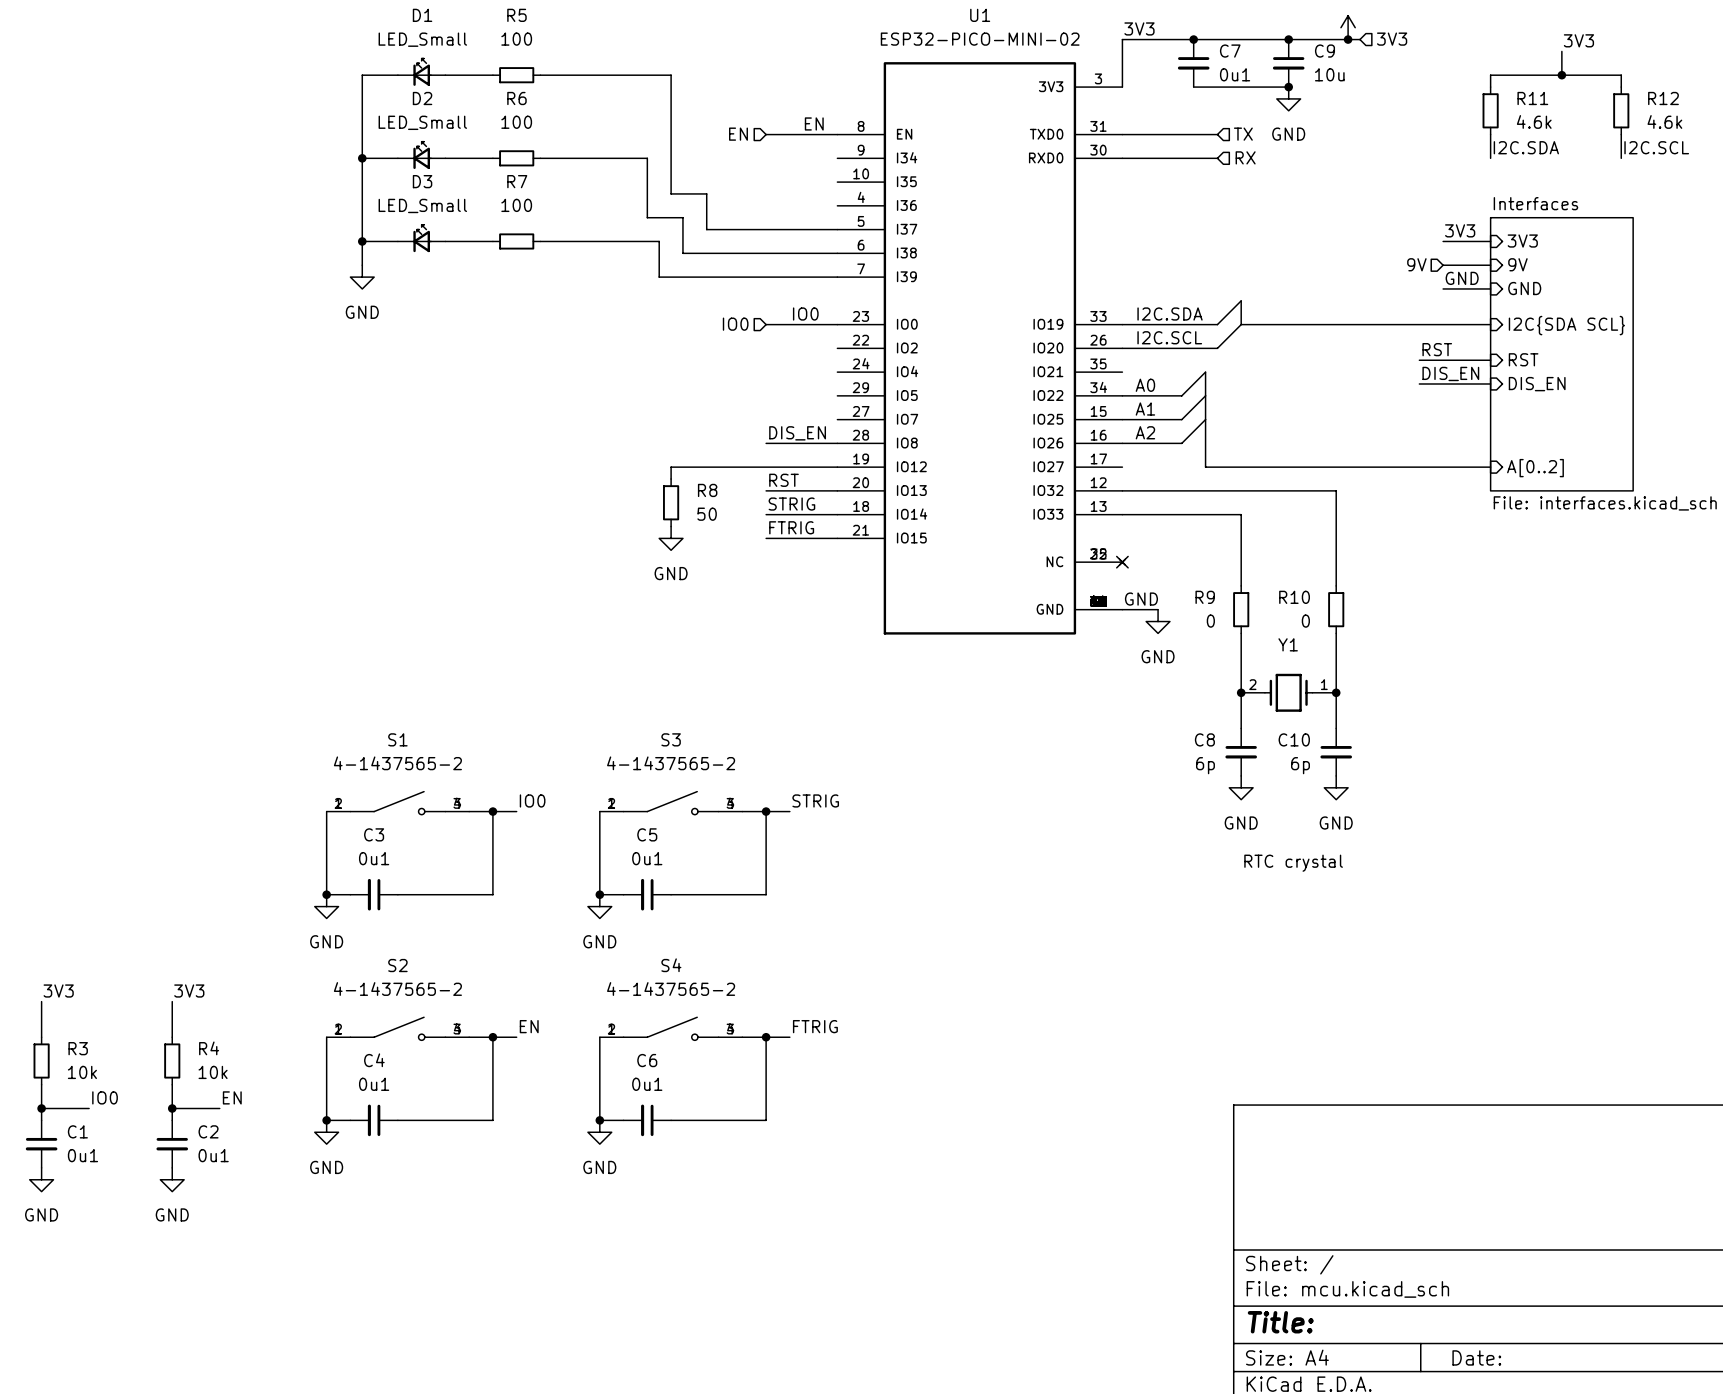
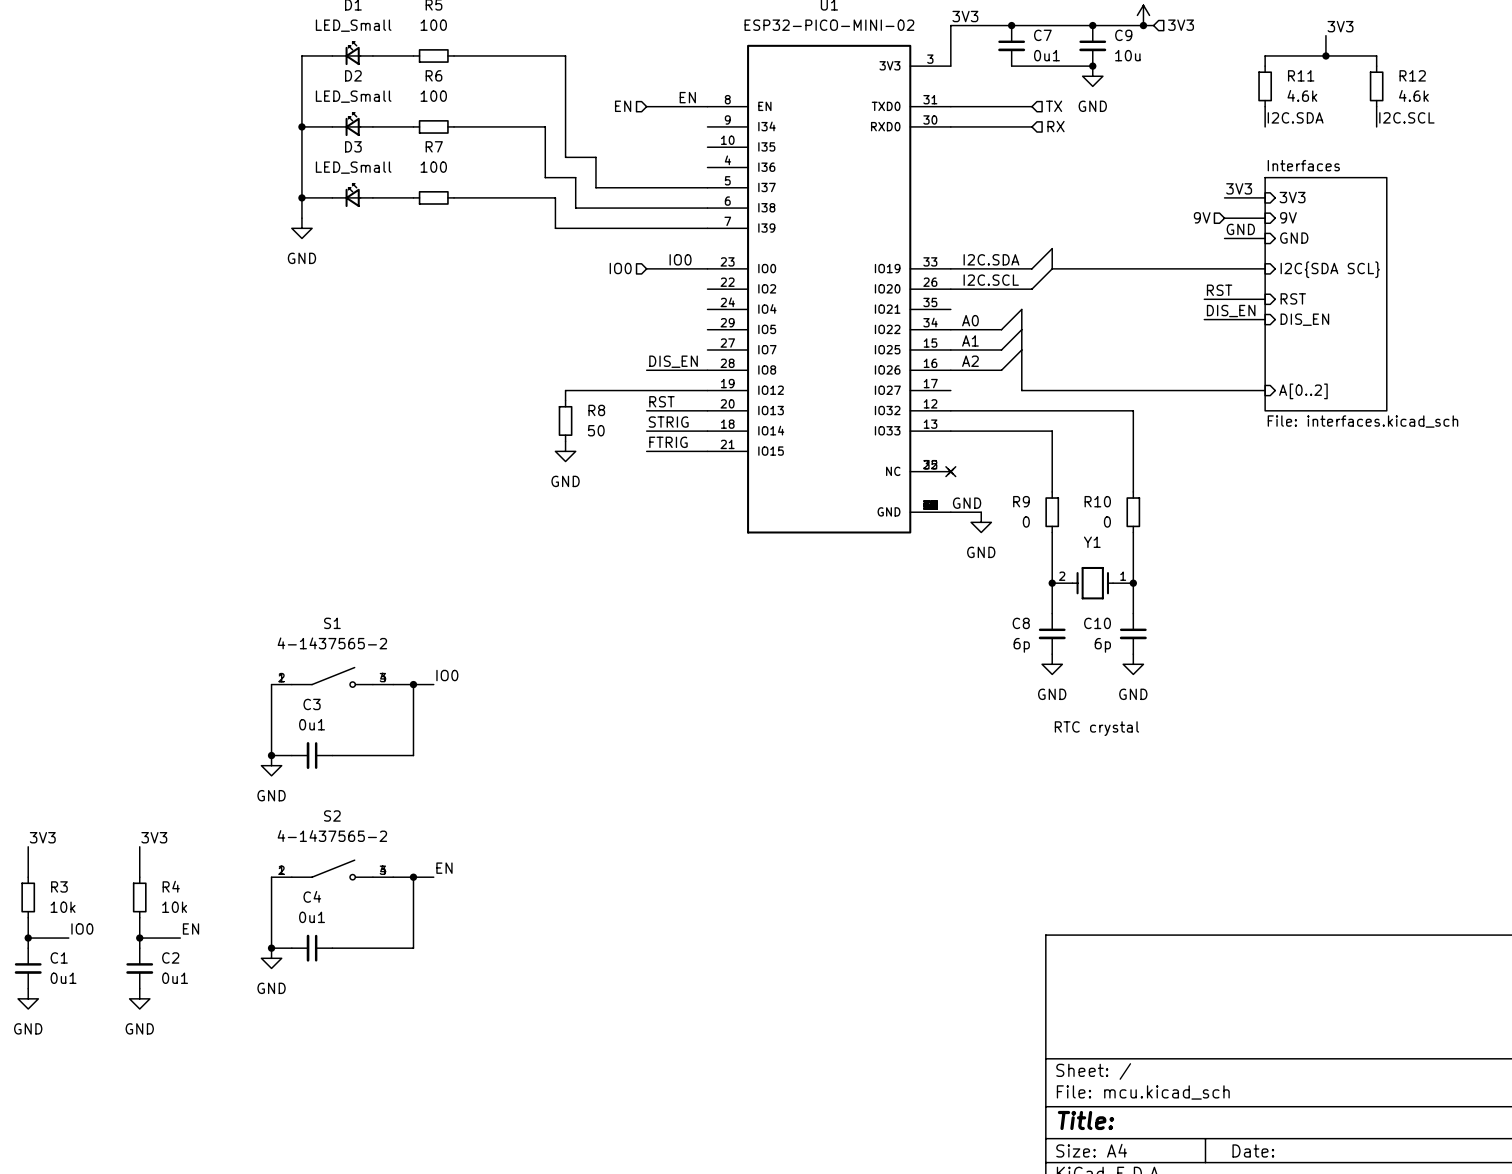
label: STRIG (815, 800) -> none
S3: 4-1437565-2 (671, 803) -> none
wire: (599, 811) (599, 894) (623, 894) -> none
wire: (742, 811) (789, 811) -> none
wire: (766, 811) (766, 894) (671, 894) -> none
junction: (766, 811) -> none
junction: (599, 894) -> none
C5: 0u1 (647, 894) -> none
power symbol: GND (599, 906) -> none
label: FTRIG (815, 1026) -> none
S4: 4-1437565-2 (671, 1028) -> none
wire: (599, 1037) (599, 1120) (623, 1120) -> none
wire: (742, 1037) (789, 1037) -> none
wire: (766, 1037) (766, 1120) (671, 1120) -> none
junction: (766, 1037) -> none
junction: (599, 1120) -> none
C6: 0u1 (647, 1120) -> none
power symbol: GND (599, 1132) -> none

